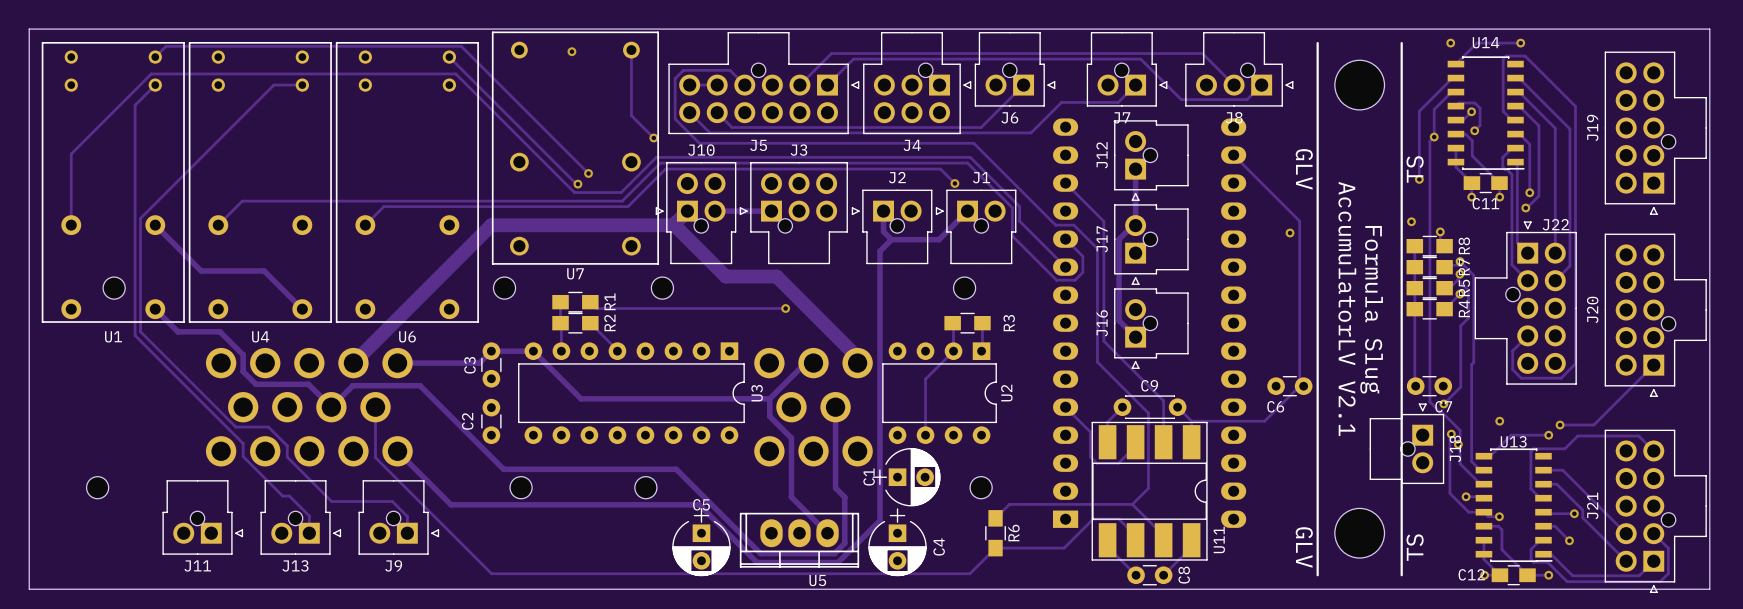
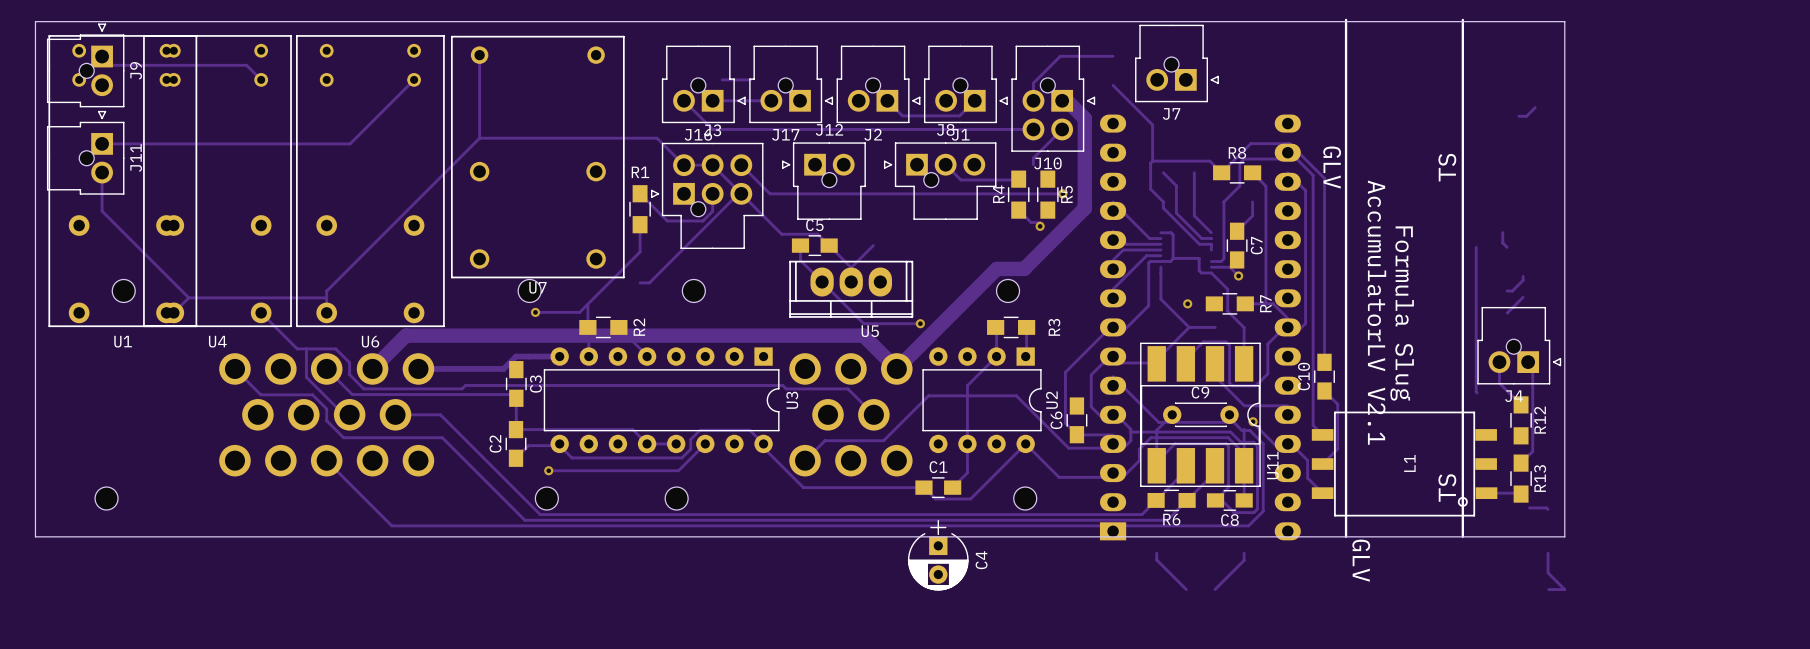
line: none -> (1346, 19) (1346, 536)
line: none -> (1462, 19) (1462, 536)
board edge: (1500, 29) (1709, 29) (1709, 589) (29, 589) (29, 524) -> (1564, 21) (1564, 536) (35, 536)
J4 footprint: [863, 32, 972, 135] -> [1477, 306, 1562, 385]
line: (1317, 43) (1317, 575) -> none
line: (1401, 43) (1401, 575) -> none
via: (1450, 43) -> none
track: (1520, 43) (1476, 43) (1455, 64) -> none
via: (1520, 43) -> none
track: (631, 50) (631, 115) (653, 137) -> none
via: (571, 51) -> none
track: (155, 57) (166, 46) (461, 46) (588, 173) -> none
track: (449, 57) (577, 184) -> none
track: none -> (479, 55) (479, 138)
track: none -> (102, 56) (110, 65) (246, 65) (261, 79)
track: none -> (1113, 56) (1060, 56) (1033, 83) (1033, 100)
J6: (1015, 69) -> none
J8 rotation: 0° (1239, 69) -> 180° (940, 181)
J8 position: (1239, 69) -> (940, 181)
track: (1455, 78) (1452, 78) (1419, 111) (1419, 179) -> none
track: (1515, 78) (1519, 78) (1569, 129) (1569, 266) (1555, 280) -> none
J5: (763, 83) -> none
track: (155, 85) (135, 105) (135, 335) (243, 443) (243, 456) (282, 496) (289, 496) (309, 516) (309, 533) -> none
track: (302, 85) (273, 85) (140, 218) (140, 331) (235, 427) (268, 427) (287, 445) (287, 457) (331, 501) (392, 501) (407, 516) (407, 533) -> none
track: none -> (414, 79) (350, 143) (102, 143)
track: (744, 85) (730, 70) (683, 70) (675, 78) (675, 119) (699, 143) (973, 143) (1055, 225) (1073, 225) (1097, 248) (1097, 362) (1148, 413) (1148, 488) (1132, 504) -> none
track: (799, 85) (831, 53) (1202, 53) (1234, 85) -> none
track: (827, 85) (853, 59) (1140, 59) (1181, 99) (1247, 99) (1261, 85) -> none
track: (1023, 85) (981, 127) (732, 127) (717, 112) -> none
track: (1135, 85) (1118, 102) (1061, 102) (1031, 132) (709, 132) (689, 112) -> none
part: (1359, 85) -> none
track: none -> (1113, 85) (1152, 124) (1152, 161)
track: (1455, 92) (1451, 92) (1434, 109) (1434, 137) (1429, 141) (1429, 401) (1460, 430) (1460, 463) (1480, 484) (1483, 484) -> none
track: (1515, 92) (1519, 92) (1555, 128) (1555, 253) -> none
track: none -> (684, 100) (712, 129) (1033, 129)
track: none -> (887, 100) (902, 115) (959, 115) (974, 100)
track: (1455, 106) (1459, 103) (1474, 103) (1480, 108) (1480, 125) (1474, 130) -> none
track: (1515, 106) (1519, 106) (1538, 125) (1538, 196) (1525, 208) -> none
via: (1471, 111) -> none
U14: (1486, 113) -> none
track: (1515, 120) (1511, 120) (1503, 111) (1503, 59) (1506, 56) (1525, 56) (1575, 106) (1575, 363) (1561, 378) (1521, 378) (1512, 369) (1512, 350) (1527, 335) -> none
via: (1474, 130) -> none
track: none -> (1062, 129) (1033, 158) (1033, 164)
J19: (1655, 133) -> none
track: (1455, 134) (1465, 134) (1472, 140) (1472, 155) (1499, 183) (1499, 197) -> none
track: (1515, 134) (1519, 134) (1529, 144) (1529, 192) -> none
via: (653, 137) -> none
via: (1434, 137) -> none
track: none -> (479, 138) (326, 291) (326, 312)
track: none -> (479, 138) (657, 138) (684, 165) (712, 165) (738, 191) (738, 193)
U7 position: (575, 148) -> (537, 157)
track: (1455, 148) (1455, 167) (1471, 183) (1471, 197) -> none
track: (1515, 148) (1512, 148) (1502, 157) (1502, 167) (1511, 174) (1511, 264) (1527, 280) -> none
track: (1233, 155) (1299, 221) (1299, 386) -> none
J12 rotation: 0° (1151, 160) -> 90° clockwise (823, 181)
J12 position: (1151, 160) -> (823, 181)
track: (1515, 162) (1517, 163) (1517, 242) (1527, 253) -> none
track: none -> (1152, 161) (1209, 161) (1221, 172) (1250, 143) (1289, 143) (1324, 178) (1324, 362)
track: none -> (1152, 161) (1150, 163) (1150, 189) (1163, 201) (1163, 208) (1199, 244) (1211, 244) (1211, 250)
track: none -> (945, 164) (960, 180) (1018, 179)
track: none -> (741, 165) (770, 193) (1062, 193)
track: (1135, 169) (1135, 225) (1132, 225) (1119, 239) (1119, 320) (1135, 337) -> none
text position: GLV (1304, 169) -> GLV (1332, 167)
text position: TS (1415, 169) -> TS (1447, 167)
via: (588, 173) -> none
track: none -> (102, 172) (102, 211) (188, 297)
track: none -> (1163, 172) (1176, 185) (1176, 213) (1201, 238) (1211, 238)
track: none -> (1194, 172) (1194, 215) (1211, 232)
track: none -> (1252, 172) (1265, 186) (1265, 303)
track: none -> (1287, 172) (1305, 190) (1305, 323) (1296, 332) (1278, 332) (1267, 344) (1267, 373) (1255, 385) (1232, 385) (1229, 383) (1229, 345) (1225, 341) (1203, 341) (1185, 359) (1185, 363)
via: (1419, 179) -> none
U4 position: (260, 182) -> (217, 181)
U6 position: (407, 182) -> (370, 181)
track: (954, 183) (940, 169) (665, 169) (627, 206) (383, 206) (365, 225) -> none
via: (954, 183) -> none
track: (1065, 183) (1103, 221) (1103, 341) (1163, 400) (1163, 442) -> none
C11: (1485, 183) -> none
via: (577, 184) -> none
via: (1529, 192) -> none
track: none -> (640, 193) (667, 221) (702, 221) (712, 211) (712, 193)
track: none -> (738, 193) (649, 282) (640, 282)
track: none -> (738, 193) (741, 193) (781, 234) (817, 234) (851, 267)
via: none -> (1062, 193)
via: (1471, 197) -> none
via: (1499, 197) -> none
track: none -> (1113, 201) (1149, 238) (1160, 238)
track: none -> (1252, 201) (1252, 215) (1237, 231)
via: (1525, 208) -> none
track: none -> (1018, 210) (1031, 222) (1040, 222) (1040, 226)
track: (687, 211) (676, 222) (676, 227) (725, 276) (776, 276) (857, 357) (857, 363) -> none
track: (715, 211) (771, 211) -> (712, 100) (771, 100)
track: (883, 211) (883, 231) (891, 239) -> none
track: (967, 211) (939, 239) (891, 239) -> none
J10 rotation: 0° (696, 213) -> 180° (1053, 98)
J10 position: (696, 213) -> (1053, 98)
J3 position: (793, 213) -> (707, 195)
via: (1411, 221) -> none
track: none -> (640, 224) (640, 251) (579, 312) (535, 312)
track: (71, 225) (71, 154) (151, 73) (455, 73) (574, 192) (621, 192) (656, 157) (970, 157) (1019, 206) (1019, 221) (1065, 267) -> none
track: (155, 225) (201, 271) (264, 271) (302, 309) -> none
track: (218, 225) (242, 201) (622, 201) (660, 163) (967, 163) (1012, 207) (1012, 236) (1056, 280) (1075, 280) (1082, 272) (1082, 256) (1065, 239) -> none
track: (676, 225) (491, 225) (385, 331) -> (1062, 100) (1067, 100) (1084, 118) (1084, 208) (1024, 268) (996, 268) (896, 368) (863, 335) (405, 335)
via: none -> (1040, 226)
J2 rotation: 0° (892, 226) -> 180° (878, 84)
J2 position: (892, 226) -> (878, 84)
J1 rotation: 0° (976, 226) -> 180° (965, 84)
J1 position: (976, 226) -> (965, 84)
track: none -> (1113, 231) (1126, 244) (1160, 244)
via: (1440, 231) -> none
track: none -> (1160, 232) (1171, 232) (1173, 234) (1173, 258) (1170, 261) (1161, 261)
via: (1290, 233) -> none
track: (891, 239) (879, 251) (879, 520) (838, 562) (757, 562) (699, 504) (451, 504) (397, 451) -> none
track: none -> (800, 245) (800, 260) (863, 323) (920, 323)
track: none -> (873, 245) (851, 267)
J17 rotation: 0° (1151, 244) -> 90° counterclockwise (791, 84)
J17 position: (1151, 244) -> (791, 84)
R8 name rotation: 0° (1464, 245) -> 90° clockwise (1237, 152)
R8 name position: R8 (1464, 245) -> R8 (1237, 152)
R8 position: (1429, 246) -> (1237, 172)
track: none -> (1160, 250) (1123, 250) (1113, 260)
track: none -> (1160, 255) (1146, 255) (1113, 289)
track: none -> (1173, 258) (1199, 258) (1199, 270) (1201, 272) (1211, 272) (1227, 289) (1227, 311) (1244, 327) (1244, 363)
track: none -> (1160, 261) (1148, 263) (1148, 305) (1121, 332) (1104, 332) (1065, 372) (1065, 423) (1077, 434) (1113, 434)
track: none -> (1211, 261) (1221, 261) (1223, 258) (1223, 201) (1239, 186) (1239, 163) (1244, 159) (1296, 159) (1313, 175) (1313, 425) (1322, 434)
via: (1460, 261) -> none
track: none -> (1160, 267) (1160, 299) (1189, 327)
track: none -> (1211, 267) (1229, 267)
track: none -> (1229, 267) (1238, 275)
R7 position: (1429, 267) -> (1229, 303)
track: (1444, 267) (1446, 265) (1463, 265) (1473, 275) (1471, 461) (1480, 470) (1483, 470) -> none
via: none -> (1238, 275)
via: (1459, 274) -> none
track: (1457, 279) (1468, 290) (1468, 318) (1460, 325) (1460, 387) (1443, 403) -> none
R5 rotation: 0° (1429, 288) -> 90° clockwise (1047, 194)
R5 position: (1429, 288) -> (1047, 194)
track: none -> (188, 297) (173, 312)
track: none -> (188, 297) (326, 297)
via: (1459, 294) -> none
via: none -> (1187, 303)
track: none -> (1245, 303) (1273, 303) (1287, 318)
R1 name position: R1 (610, 301) -> R1 (640, 172)
R1 rotation: 0° (575, 302) -> 90° clockwise (640, 209)
R1 position: (575, 302) -> (640, 209)
track: (590, 302) (596, 308) (785, 308) -> none
J22: (1525, 303) -> none
via: none -> (535, 312)
via: (785, 308) -> none
text position: AccumulatorLV V2.1 (1347, 308) -> AccumulatorLV V2.1 (1376, 312)
R4 name position: R4 (1464, 308) -> R4 (998, 194)
track: (155, 309) (177, 331) (220, 331) (243, 354) (243, 371) (255, 384) (308, 384) (331, 407) (352, 385) (420, 385) (503, 469) (676, 469) (760, 553) (834, 553) (844, 543) (844, 497) (835, 488) (835, 407) -> (261, 312) (297, 348) (335, 348) (349, 362) (349, 374) (363, 388) (462, 388) (465, 385) (782, 385) (786, 388) (847, 388) (873, 414)
text position: Formula Slug (1371, 309) -> Formula Slug (1402, 313)
R4 rotation: 0° (1429, 309) -> 90° clockwise (1018, 194)
R4 position: (1429, 309) -> (1018, 194)
J20: (1655, 315) -> none
via: none -> (920, 323)
track: none -> (1189, 327) (1215, 327)
track: none -> (1189, 327) (1155, 360) (1155, 362)
J16 rotation: 0° (1151, 328) -> 90° counterclockwise (703, 84)
J16 position: (1151, 328) -> (703, 84)
C3 footprint: [481, 342, 502, 388] -> [505, 361, 527, 407]
track: none -> (306, 348) (306, 377) (343, 414) (349, 414)
track: (533, 351) (581, 398) (769, 398) -> none
track: none -> (1499, 362) (1499, 383) (1521, 404)
track: none -> (1528, 362) (1532, 366) (1532, 451) (1521, 463)
track: none -> (1155, 362) (1103, 362) (1091, 374) (1091, 406) (1104, 420) (1121, 420) (1130, 429) (1130, 440) (1123, 448) (1068, 448) (1016, 395) (928, 395) (883, 440) (825, 440) (805, 460)
track: none -> (1214, 363) (1214, 376) (1244, 405) (1287, 405)
track: none -> (234, 368) (260, 394) (312, 394) (326, 408) (326, 420) (343, 437) (442, 437) (524, 520) (1167, 520) (1214, 472) (1214, 465)
track: none -> (326, 368) (352, 394) (512, 394) (516, 398) (516, 429)
track: (813, 363) (805, 363) (769, 398) -> none
C3 name position: C3 (469, 365) -> C3 (535, 384)
track: (1653, 365) (1593, 425) (1560, 425) -> none
track: none -> (1113, 376) (1158, 422) (1233, 422) (1242, 430) (1249, 430) (1263, 443) (1263, 511) (1248, 525) (391, 525) (326, 460)
C10: none -> (1324, 376)
C6 footprint: [1267, 376, 1313, 397] -> [1066, 397, 1088, 444]
C7 footprint: [1406, 376, 1453, 397] -> [1226, 222, 1248, 269]
track: none -> (1324, 391) (1337, 404) (1337, 449) (1322, 464)
track: (1299, 386) (1264, 421) (1191, 421) (1177, 407) -> none
C2 footprint: [481, 398, 502, 445] -> [505, 421, 527, 467]
track: (769, 398) (769, 416) (791, 438) (791, 497) (827, 533) -> none
via: (1443, 403) -> none
track: (375, 407) (375, 457) (491, 573) (969, 573) (995, 548) (1064, 548) (1093, 519) (1118, 519) (1135, 535) (1135, 540) -> (395, 414) (440, 414) (540, 514) (1141, 514) (1185, 470) (1185, 465)
track: (1065, 407) (1090, 432) (1090, 456) (1096, 463) (1118, 463) (1135, 446) (1135, 442) -> none
R12: none -> (1521, 420)
track: none -> (1253, 421) (1279, 449) (1296, 449) (1307, 460) (1307, 478) (1322, 493)
via: none -> (1253, 421)
track: none -> (516, 429) (632, 429) (647, 443) (676, 443)
via: (1499, 421) -> none
track: none -> (1130, 432) (1230, 432) (1240, 442) (1253, 442) (1257, 446) (1257, 509) (1253, 512) (1234, 512) (1218, 497)
via: (1560, 425) -> none
track: (1451, 434) (1449, 493) (1468, 512) (1483, 512) (1488, 516) (1499, 516) -> none
via: (1451, 434) -> none
track: none -> (705, 443) (678, 470) (548, 470)
track: none -> (967, 443) (967, 472) (952, 487)
track: (1548, 435) (1511, 435) (1490, 456) (1483, 456) -> none
via: (1548, 435) -> none
track: none -> (559, 445) (528, 445) (516, 458)
track: none -> (559, 445) (572, 457) (681, 457) (690, 449) (690, 439) (700, 430) (749, 430) (763, 443) (763, 447) (803, 487) (923, 487) (935, 498) (970, 498) (1025, 443) (1059, 477) (1122, 477) (1139, 460) (1139, 449) (1150, 437) (1228, 437) (1244, 453) (1244, 500)
J18: (1406, 443) -> none
via: (1458, 444) -> none
C1 footprint: [872, 447, 941, 507] -> [915, 477, 962, 499]
track: (1653, 450) (1638, 436) (1577, 436) (1564, 448) (1533, 448) (1530, 451) (1530, 488) (1540, 498) (1543, 498) -> none
L1: none -> (1404, 464)
track: none -> (1156, 465) (1156, 462) (1174, 443) (1226, 443) (1228, 446) (1228, 487) (1215, 500)
via: none -> (548, 470)
R13: none -> (1521, 478)
track: (1543, 470) (1562, 470) (1626, 533) -> none
C1 name position: C1 (869, 477) -> C1 (938, 467)
track: none -> (1486, 493) (1521, 494)
track: (1543, 484) (1556, 484) (1582, 510) (1582, 517) (1626, 561) -> none
U11 position: (1149, 491) -> (1200, 414)
via: (1466, 496) -> none
track: (1132, 504) (1009, 504) (995, 518) -> none
track: (1132, 504) (1163, 535) (1163, 540) -> none
U13: (1514, 505) -> none
C5 footprint: [672, 508, 731, 577] -> [791, 235, 838, 257]
J21: (1655, 511) -> none
track: (1543, 512) (1574, 513) -> none
via: (1574, 513) -> none
via: (1499, 516) -> none
J11 rotation: 0° (202, 517) -> 90° counterclockwise (85, 152)
J11 position: (202, 517) -> (85, 152)
J13: (300, 517) -> none
J9 rotation: 0° (398, 517) -> 90° counterclockwise (85, 65)
J9 position: (398, 517) -> (85, 65)
track: (1483, 526) (1498, 526) (1501, 529) (1501, 549) (1527, 575) (1548, 575) -> none
track: (1543, 526) (1554, 526) (1569, 540) -> none
R6 rotation: 0° (995, 533) -> 90° clockwise (1171, 500)
R6 position: (995, 533) -> (1171, 500)
part: (1359, 533) -> none
track: (1653, 533) (1668, 548) (1668, 573) (1660, 581) (1567, 581) (1547, 562) (1533, 562) (1531, 559) (1531, 549) (1540, 540) (1543, 540) -> none
U5 position: (799, 540) -> (851, 289)
via: (1569, 540) -> none
text position: TS (1415, 547) -> TS (1447, 488)
track: (1543, 554) (1551, 554) (1572, 575) (1639, 575) (1653, 561) -> none
C8 footprint: [1127, 565, 1173, 586] -> [1206, 490, 1253, 511]
C8 name position: C8 (1184, 575) -> C8 (1229, 520)
via: (1484, 575) -> none
C12: (1513, 575) -> none
via: (1548, 575) -> none

